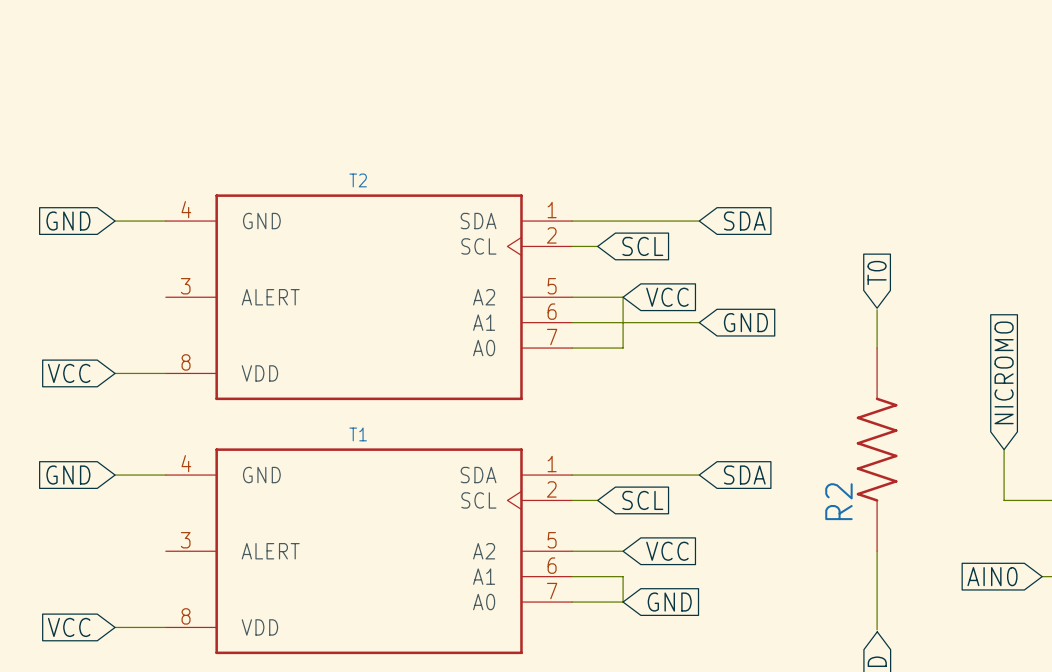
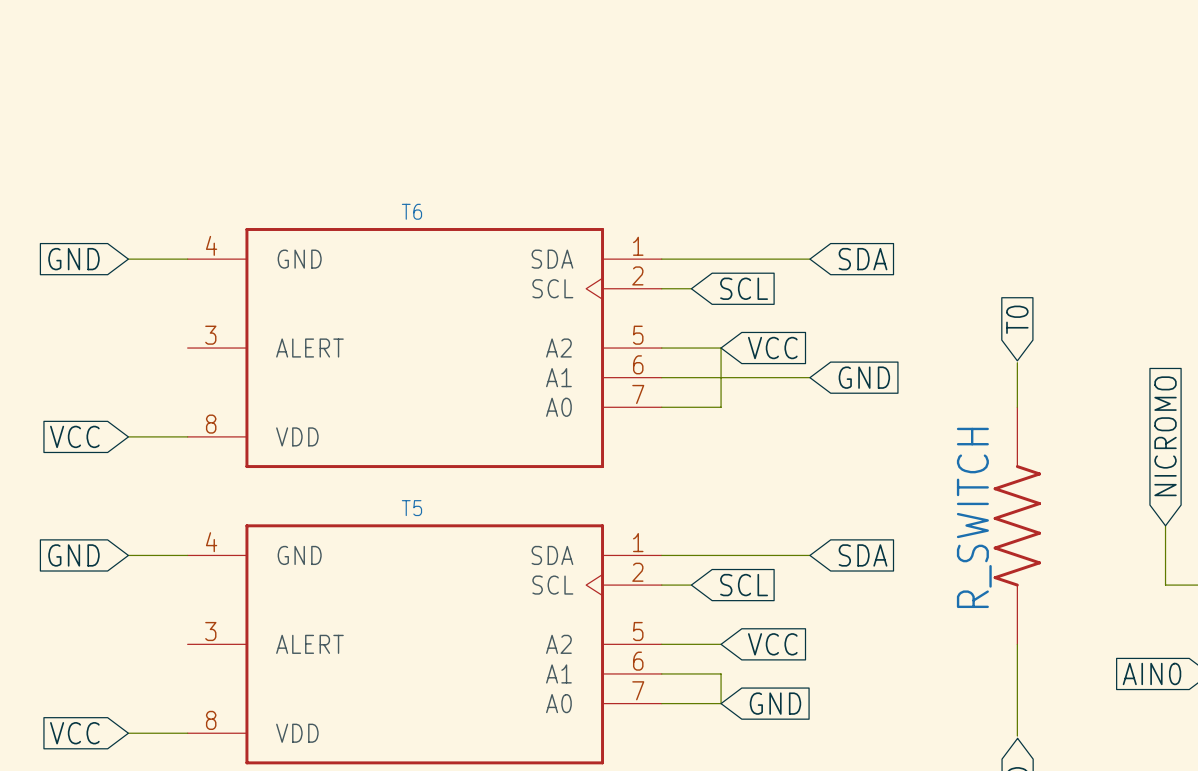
T2 name: T2 (358, 180) -> T6 (411, 211)
T1 name: T1 (358, 434) -> T5 (411, 508)
R2 name: R2 (838, 501) -> R_SWITCH (974, 517)

